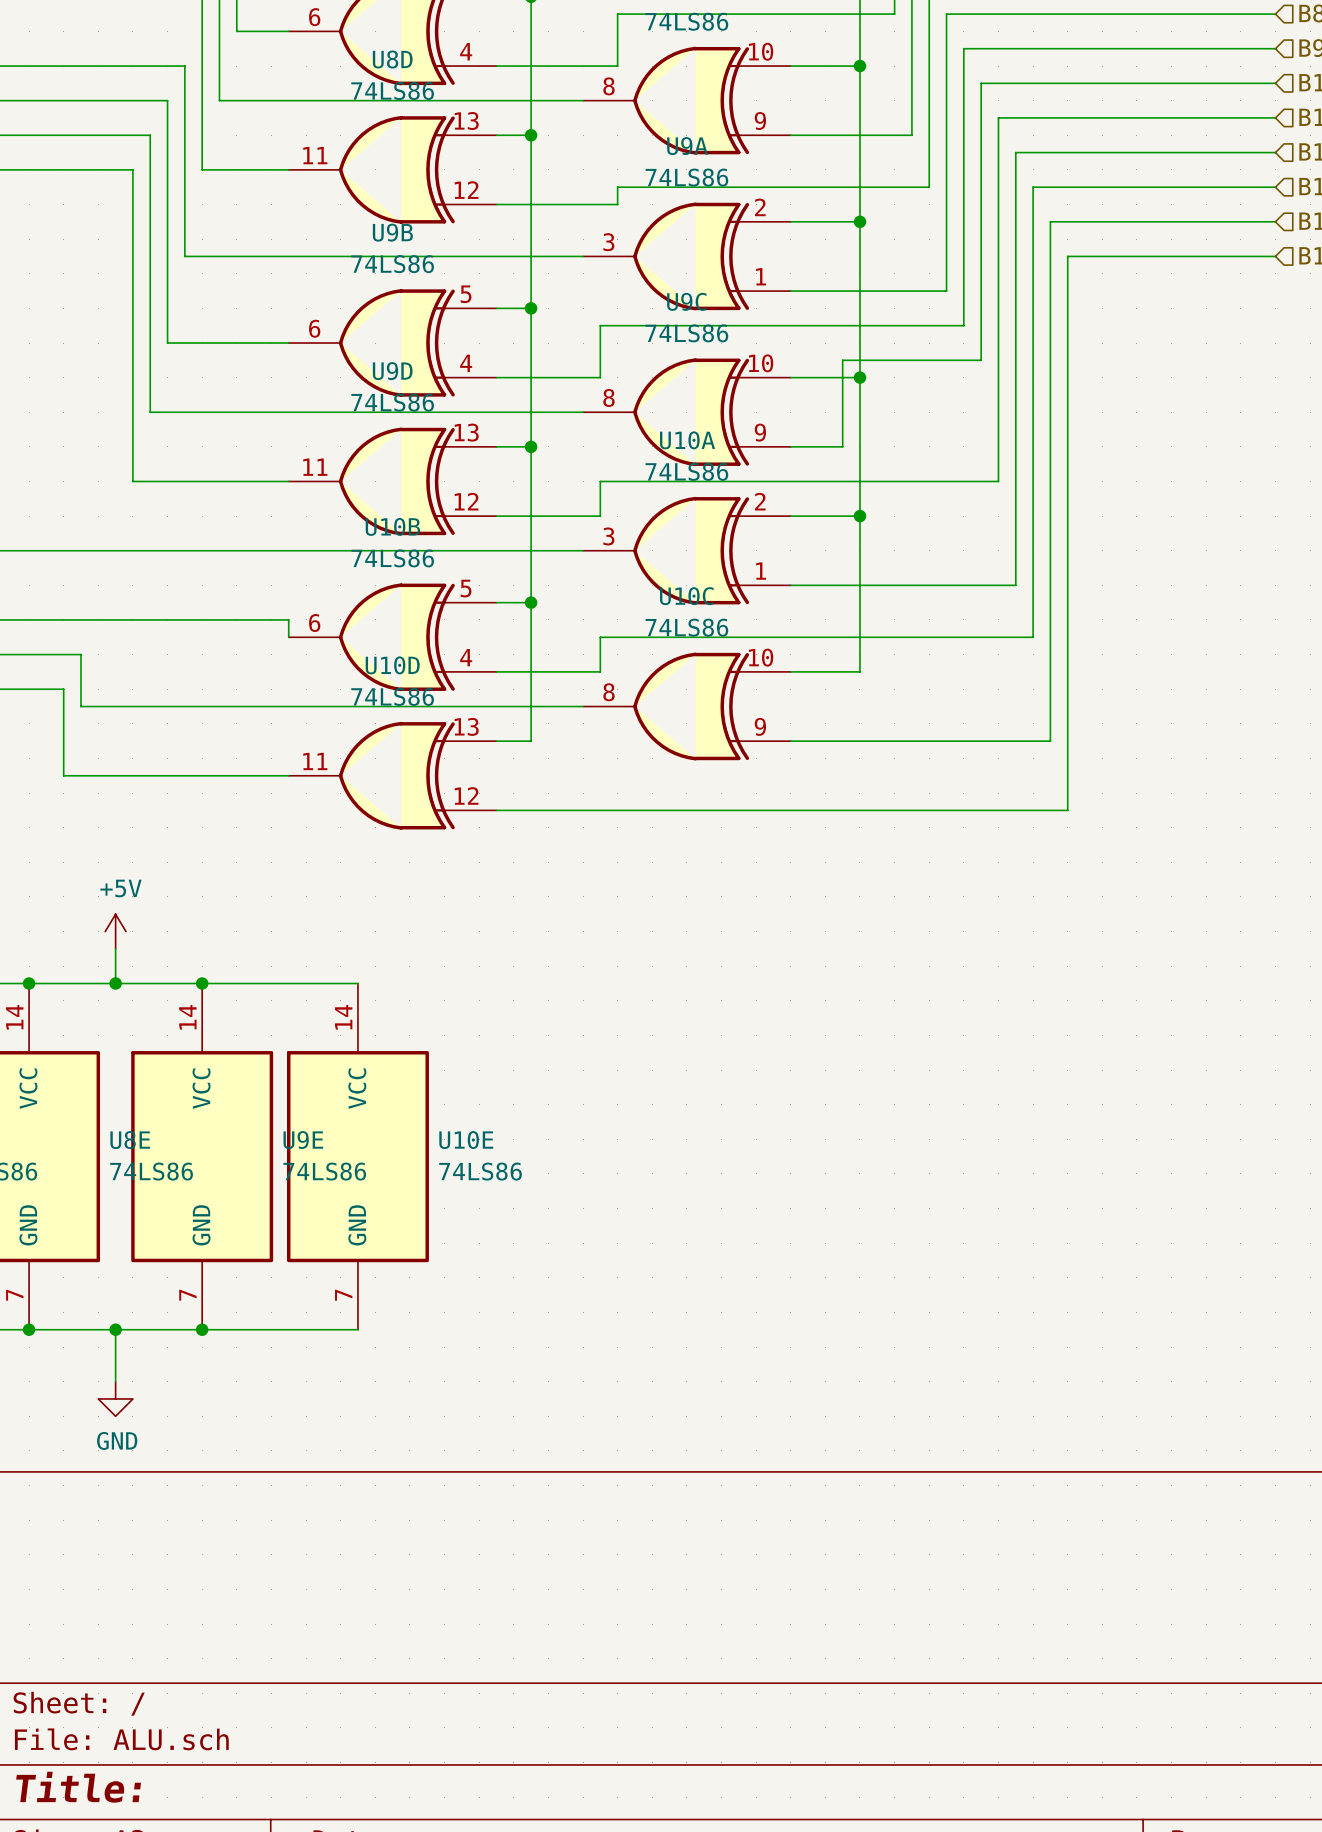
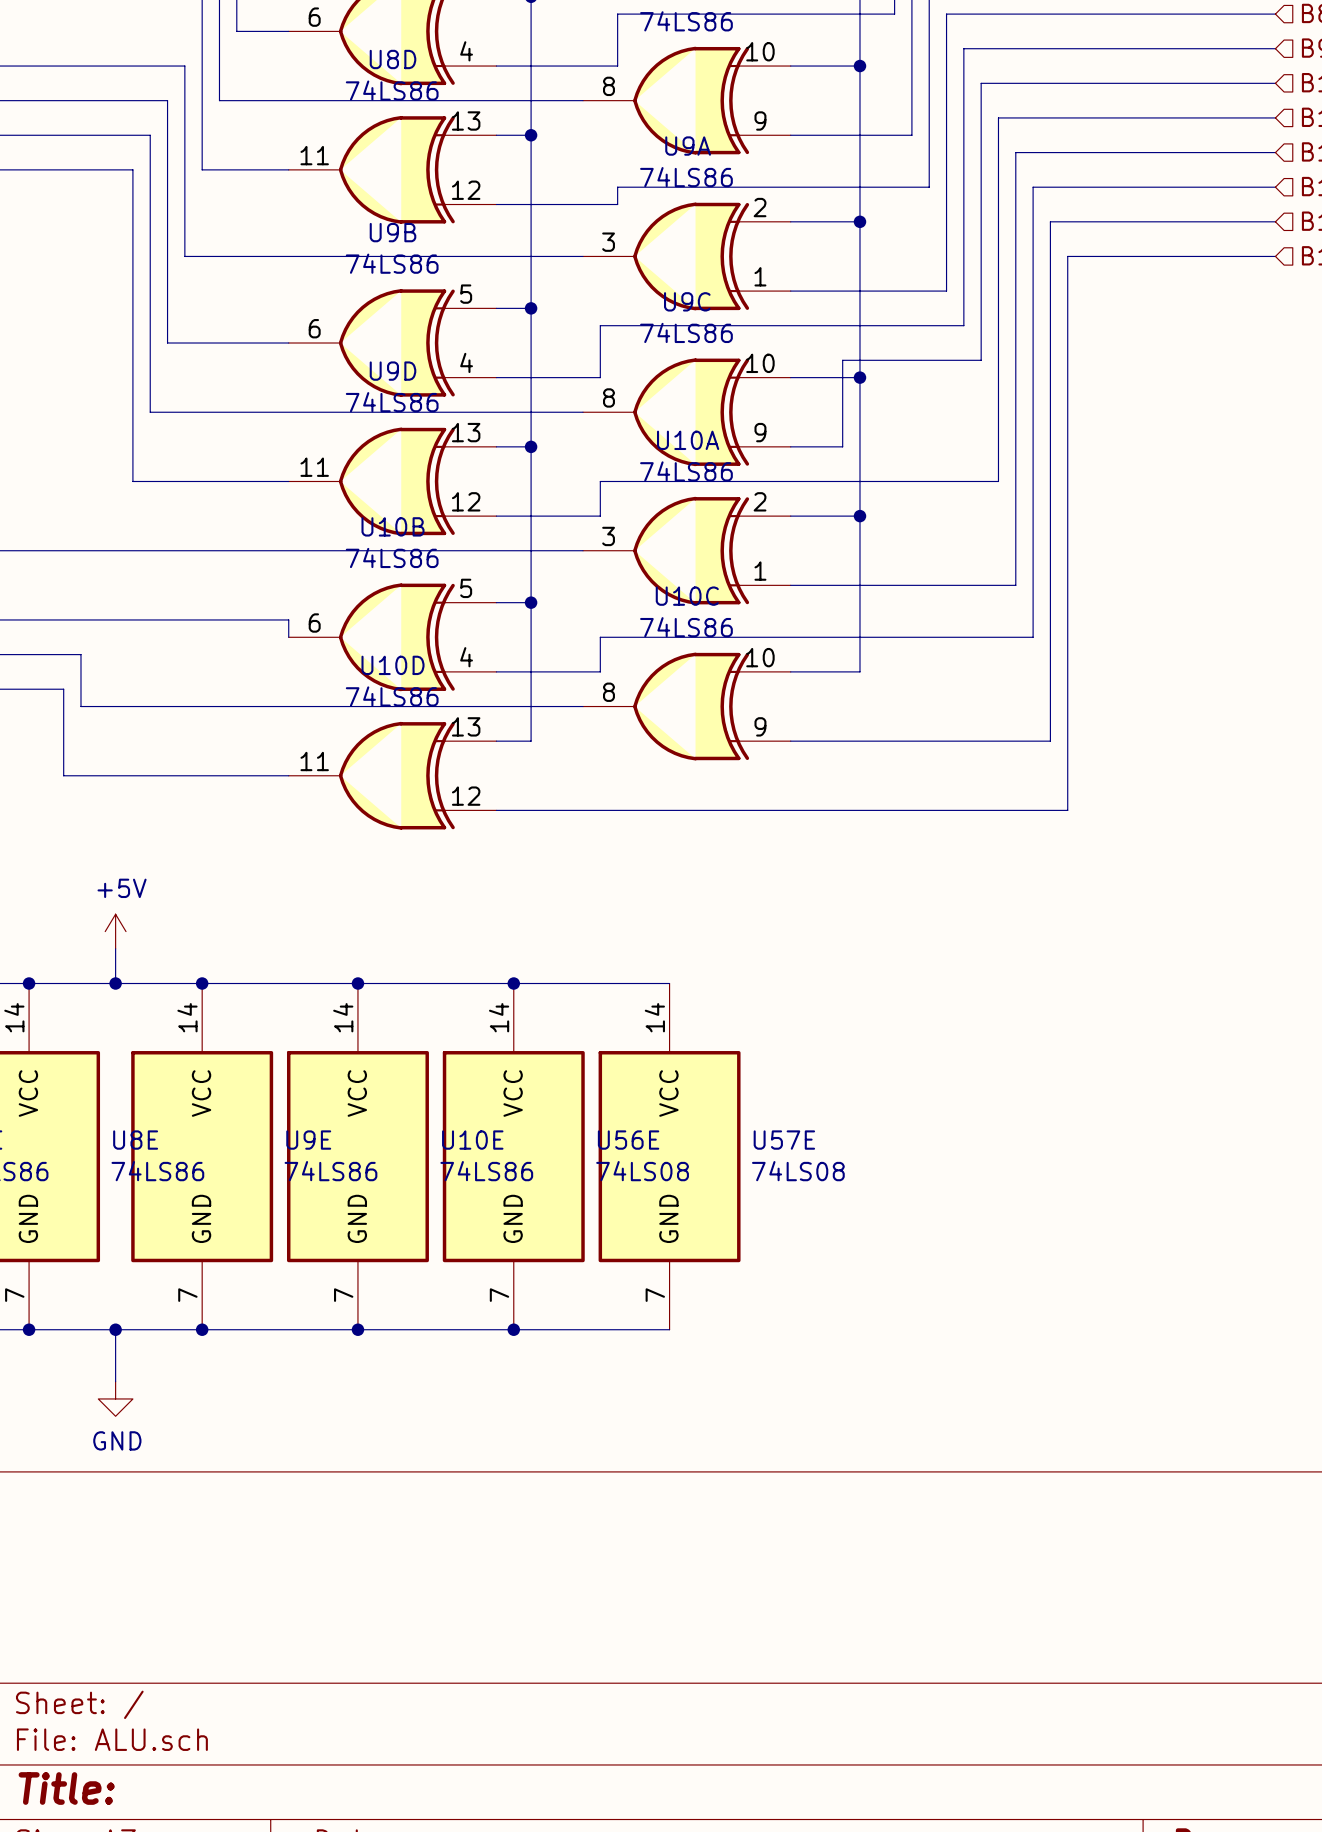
wire: none -> (357, 983) (669, 983)
junction: none -> (357, 983)
junction: none -> (513, 983)
U56E: none -> 74LS08 (513, 1156)
U57E: none -> 74LS08 (669, 1156)
wire: none -> (357, 1329) (669, 1329)
junction: none -> (357, 1329)
junction: none -> (513, 1329)

